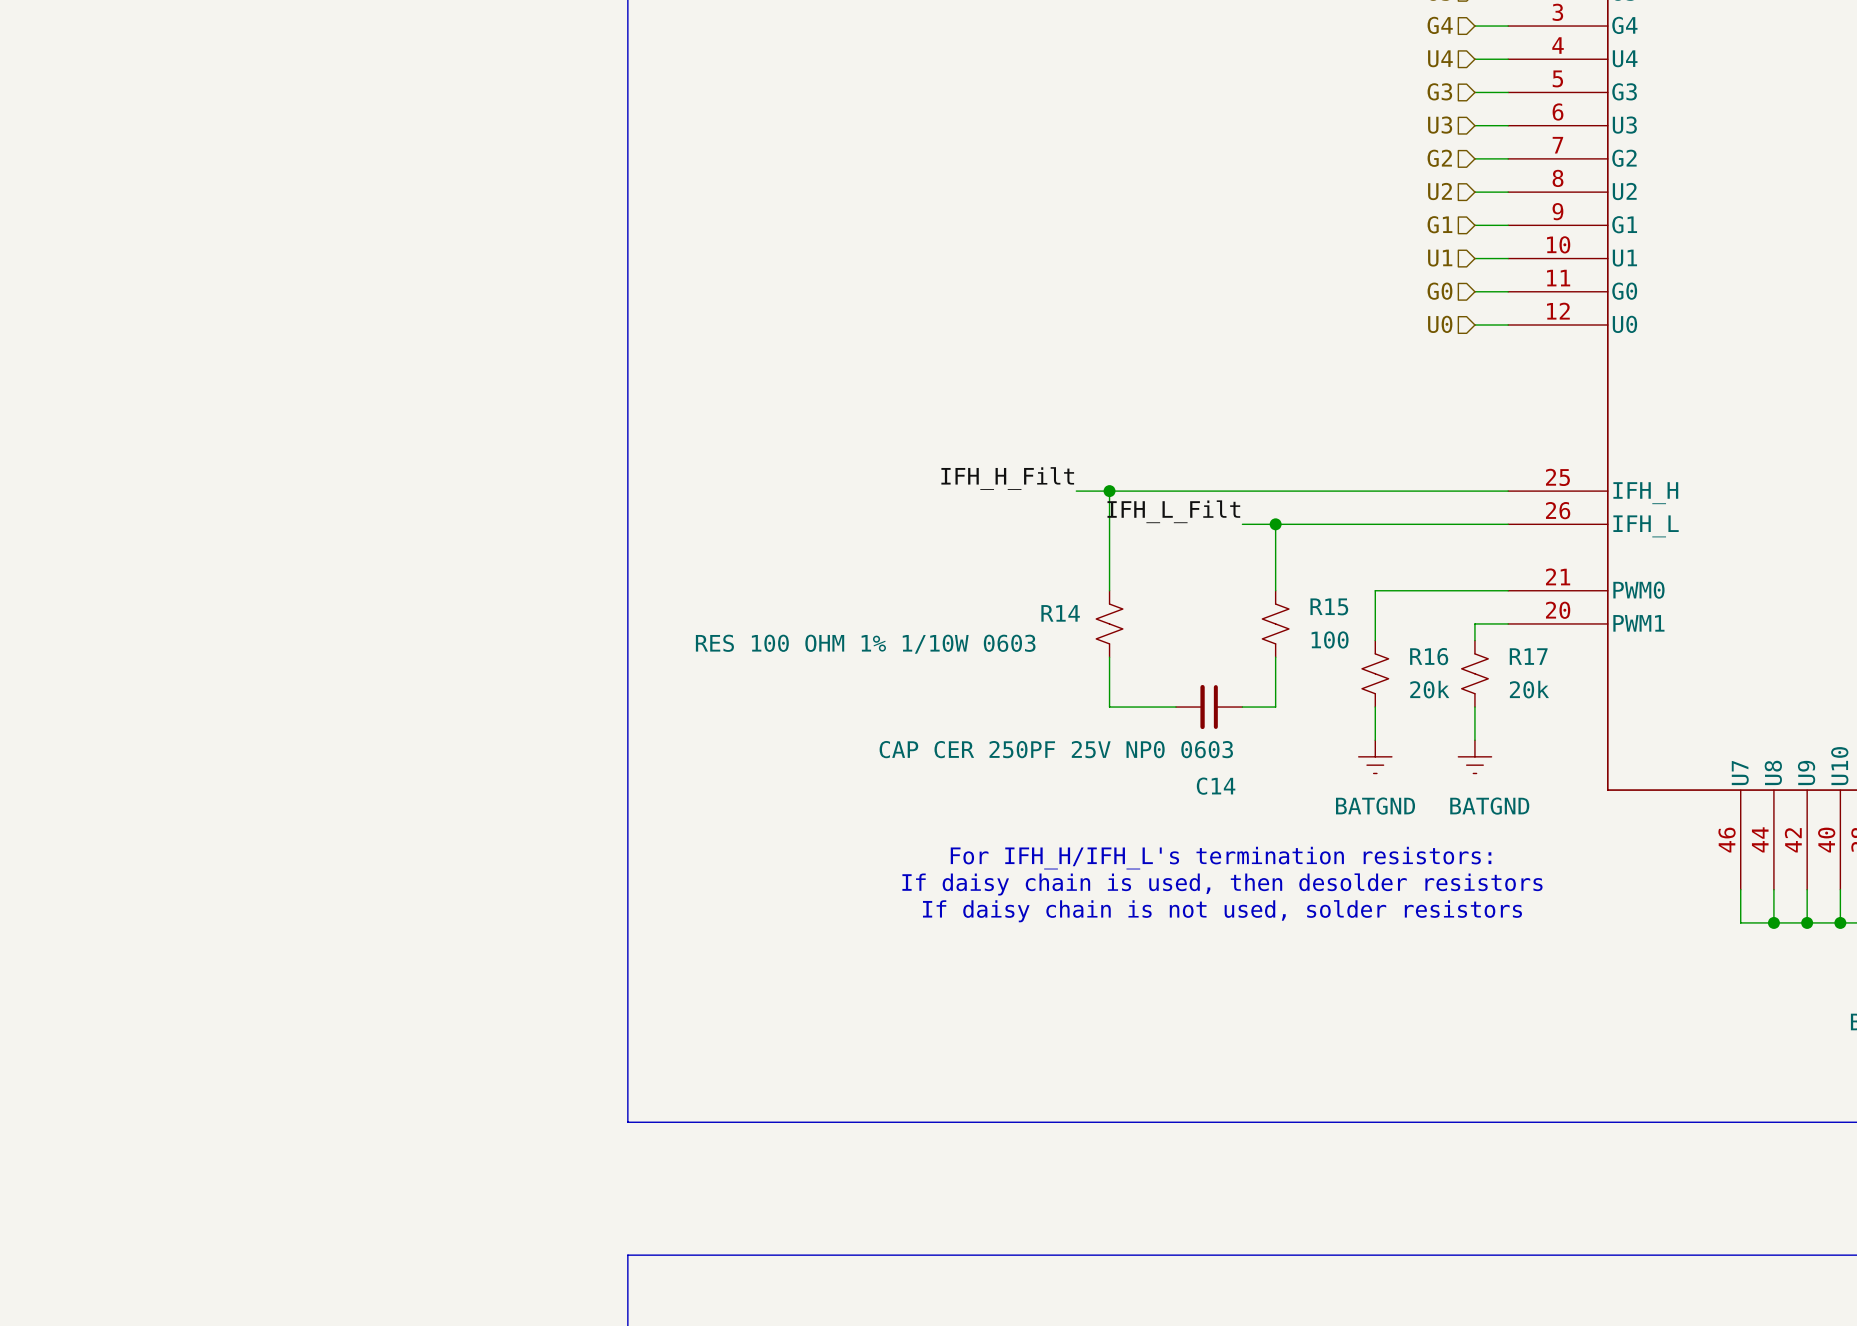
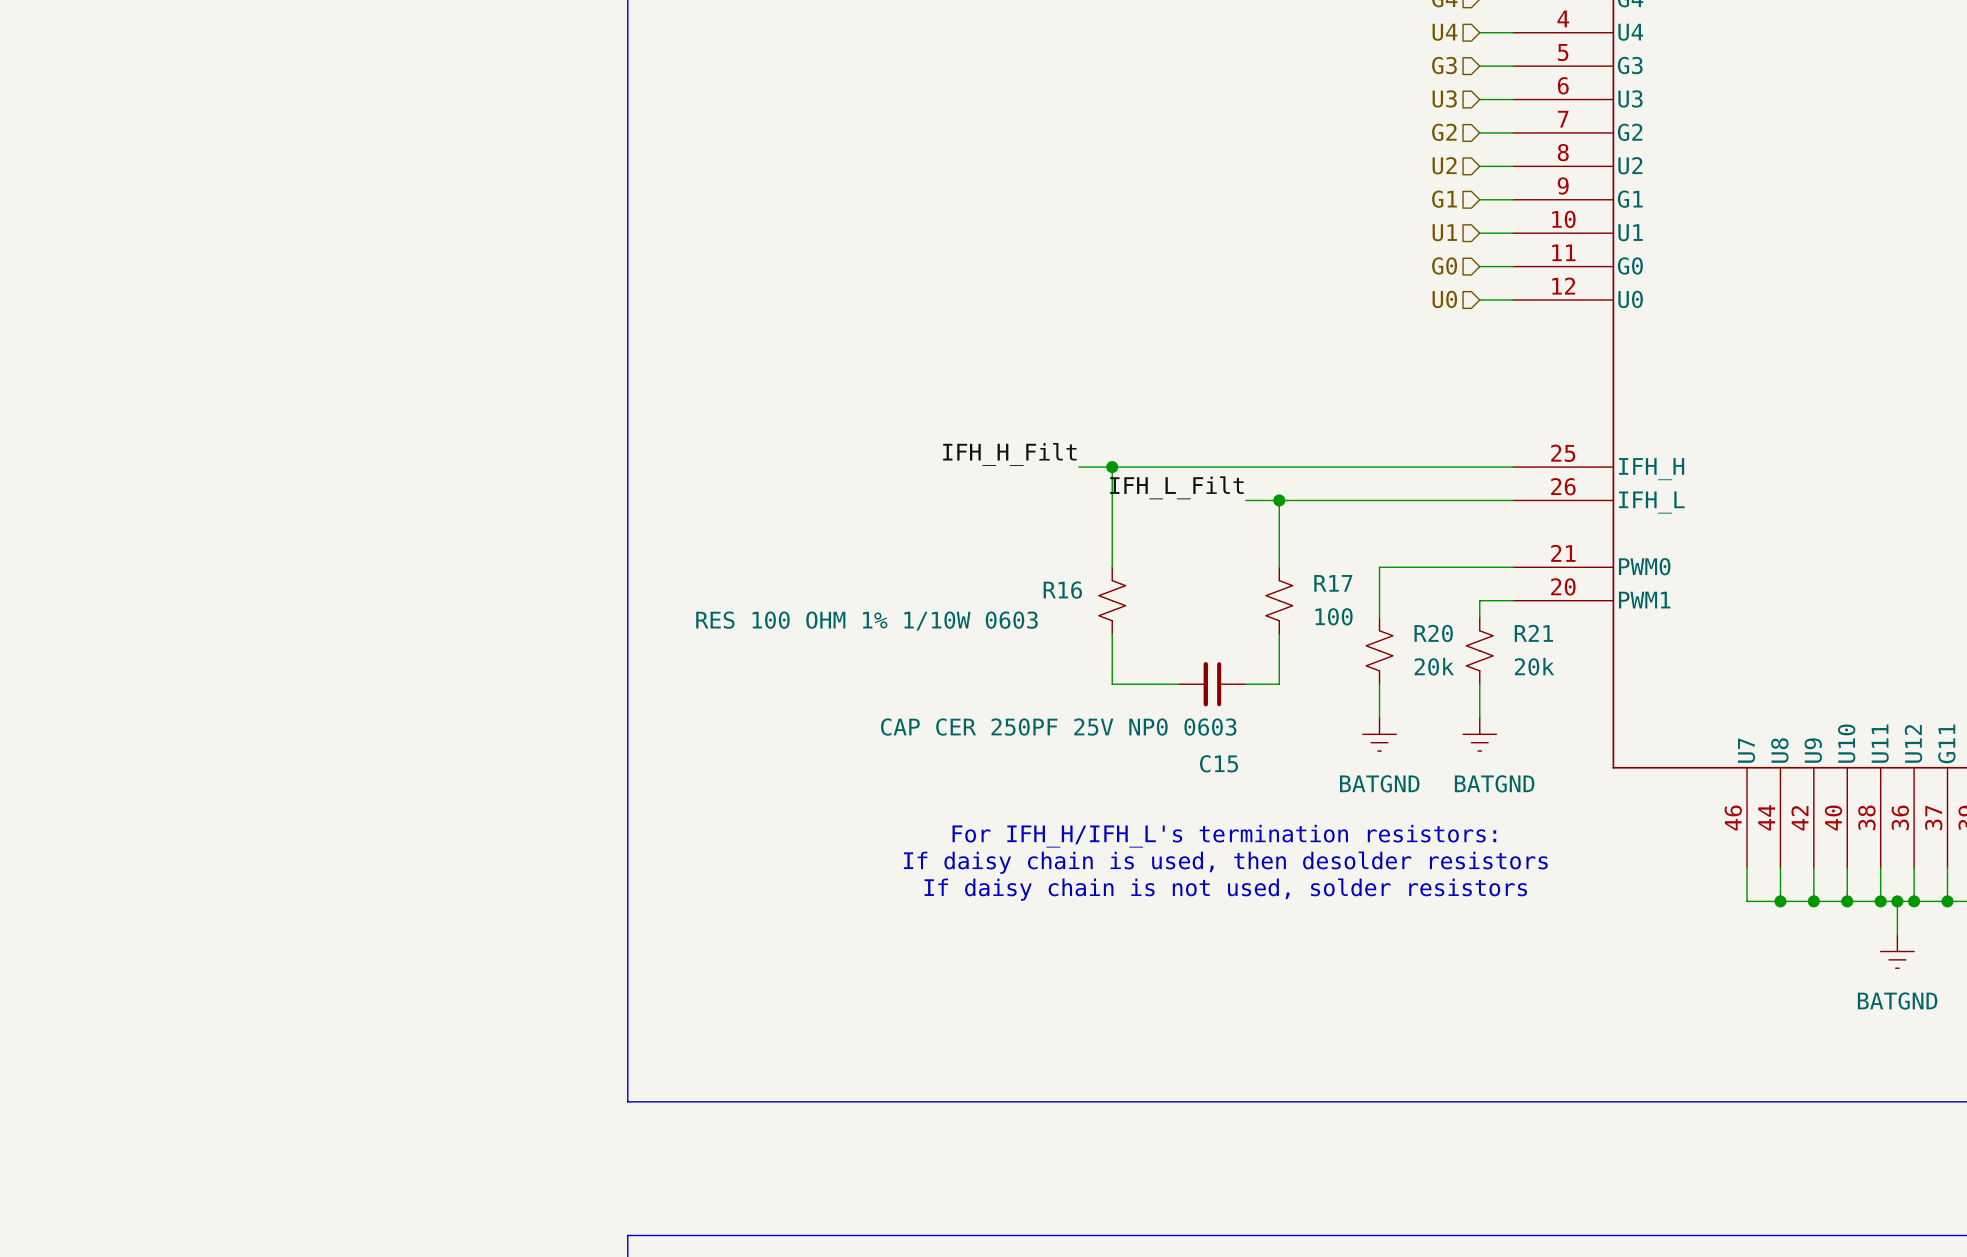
R15 name: R15 (1329, 606) -> R17 (1333, 583)
R14 name: R14 (1060, 613) -> R16 (1062, 590)
R16 name: R16 (1429, 656) -> R20 (1433, 633)
R17 name: R17 (1528, 656) -> R21 (1533, 633)
C14 name: C14 (1216, 786) -> C15 (1219, 763)

